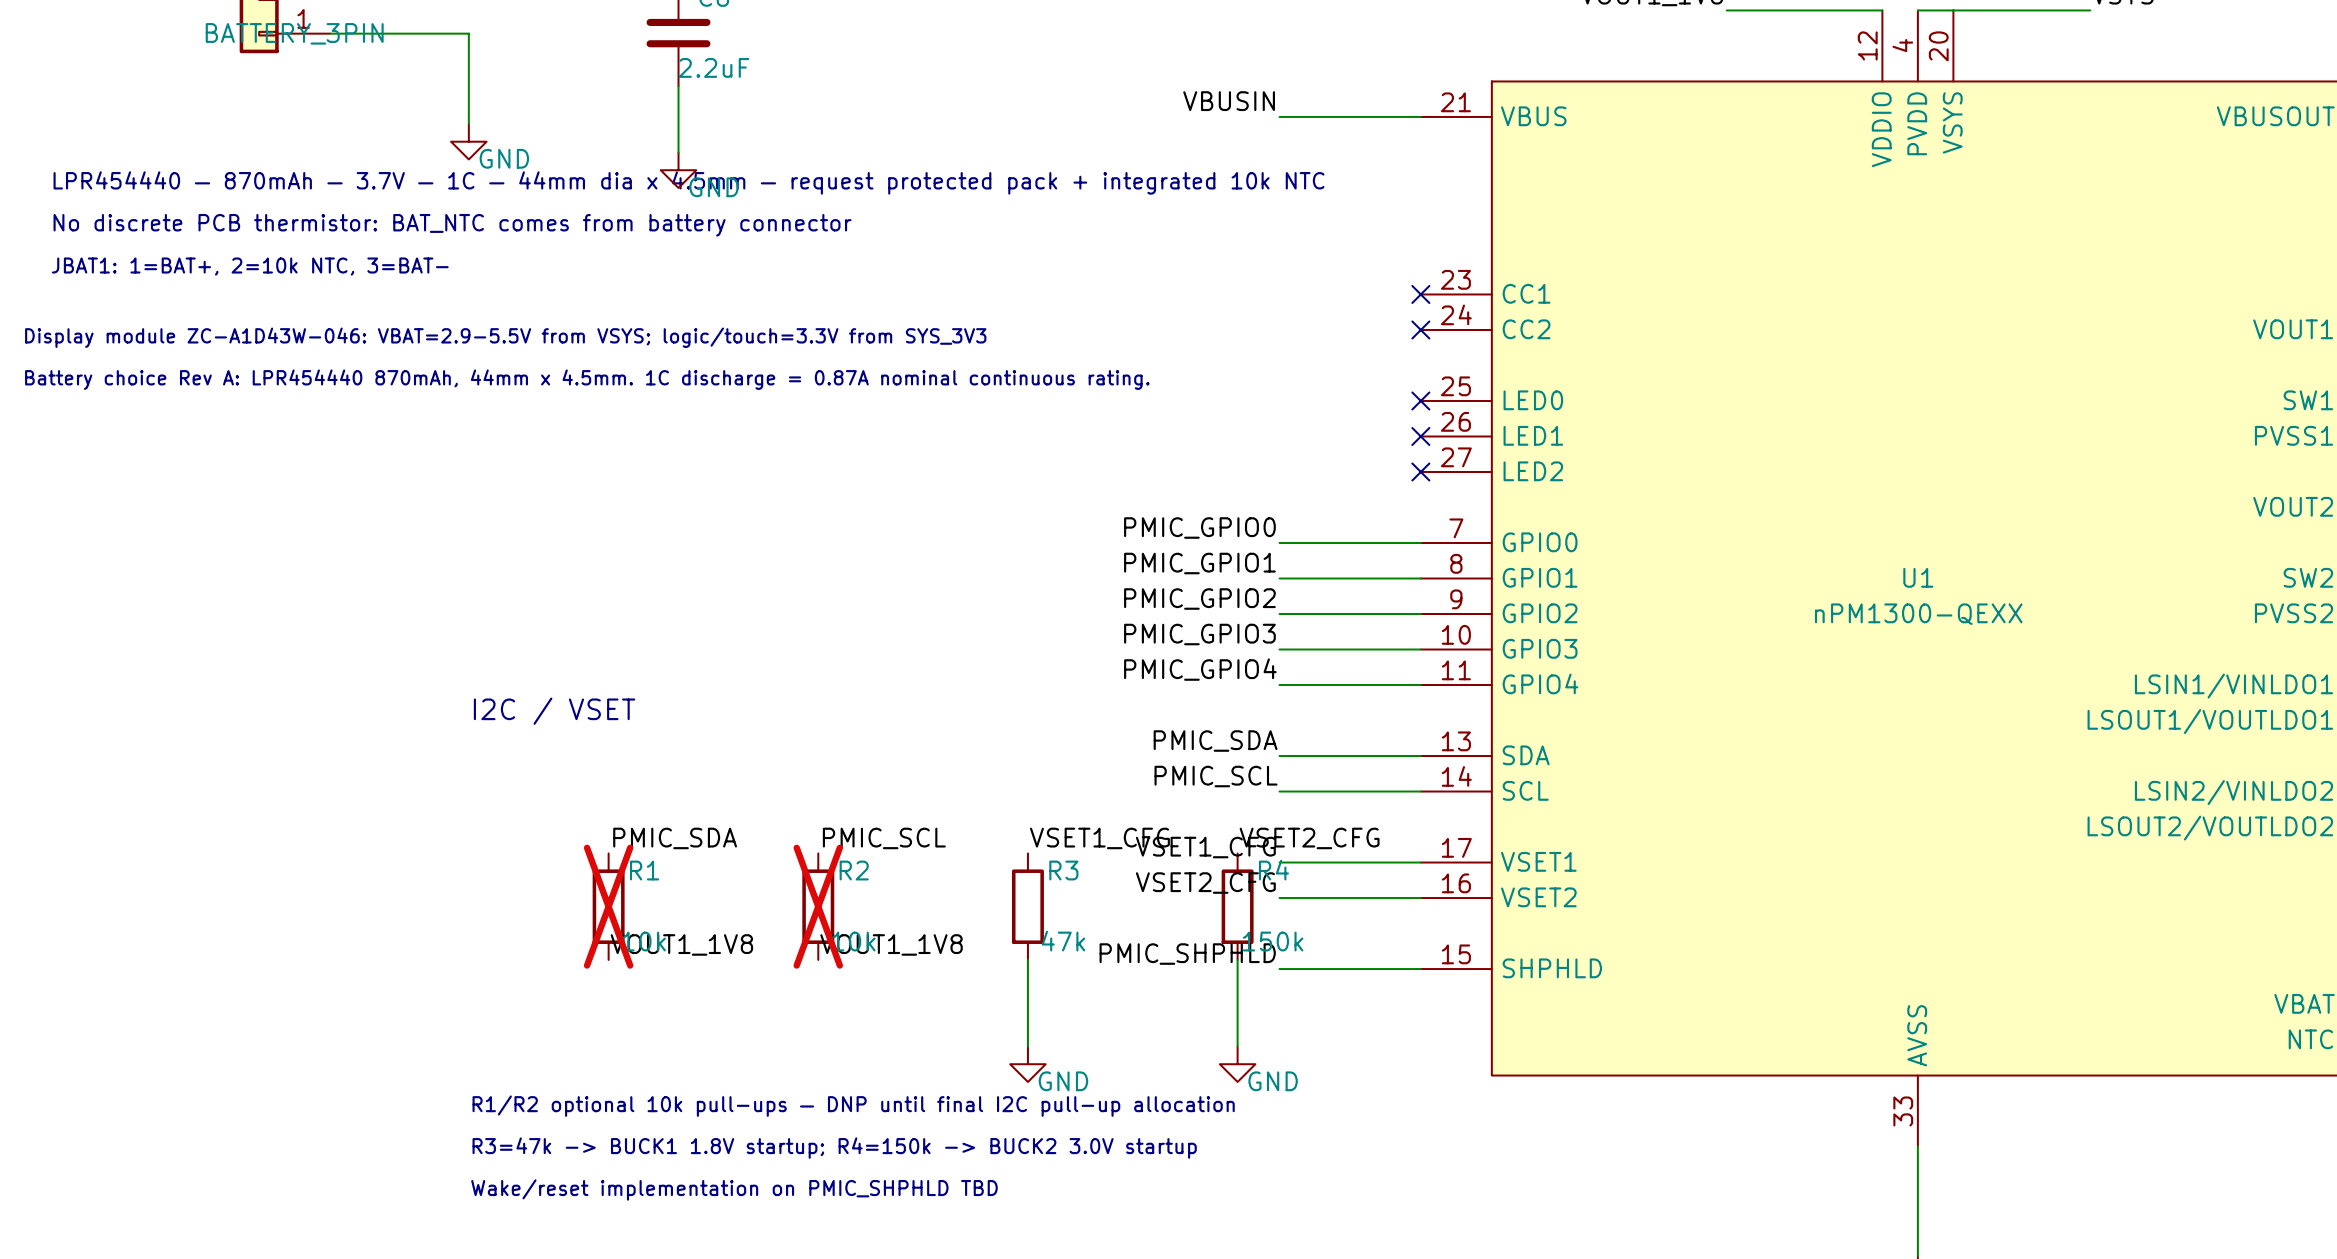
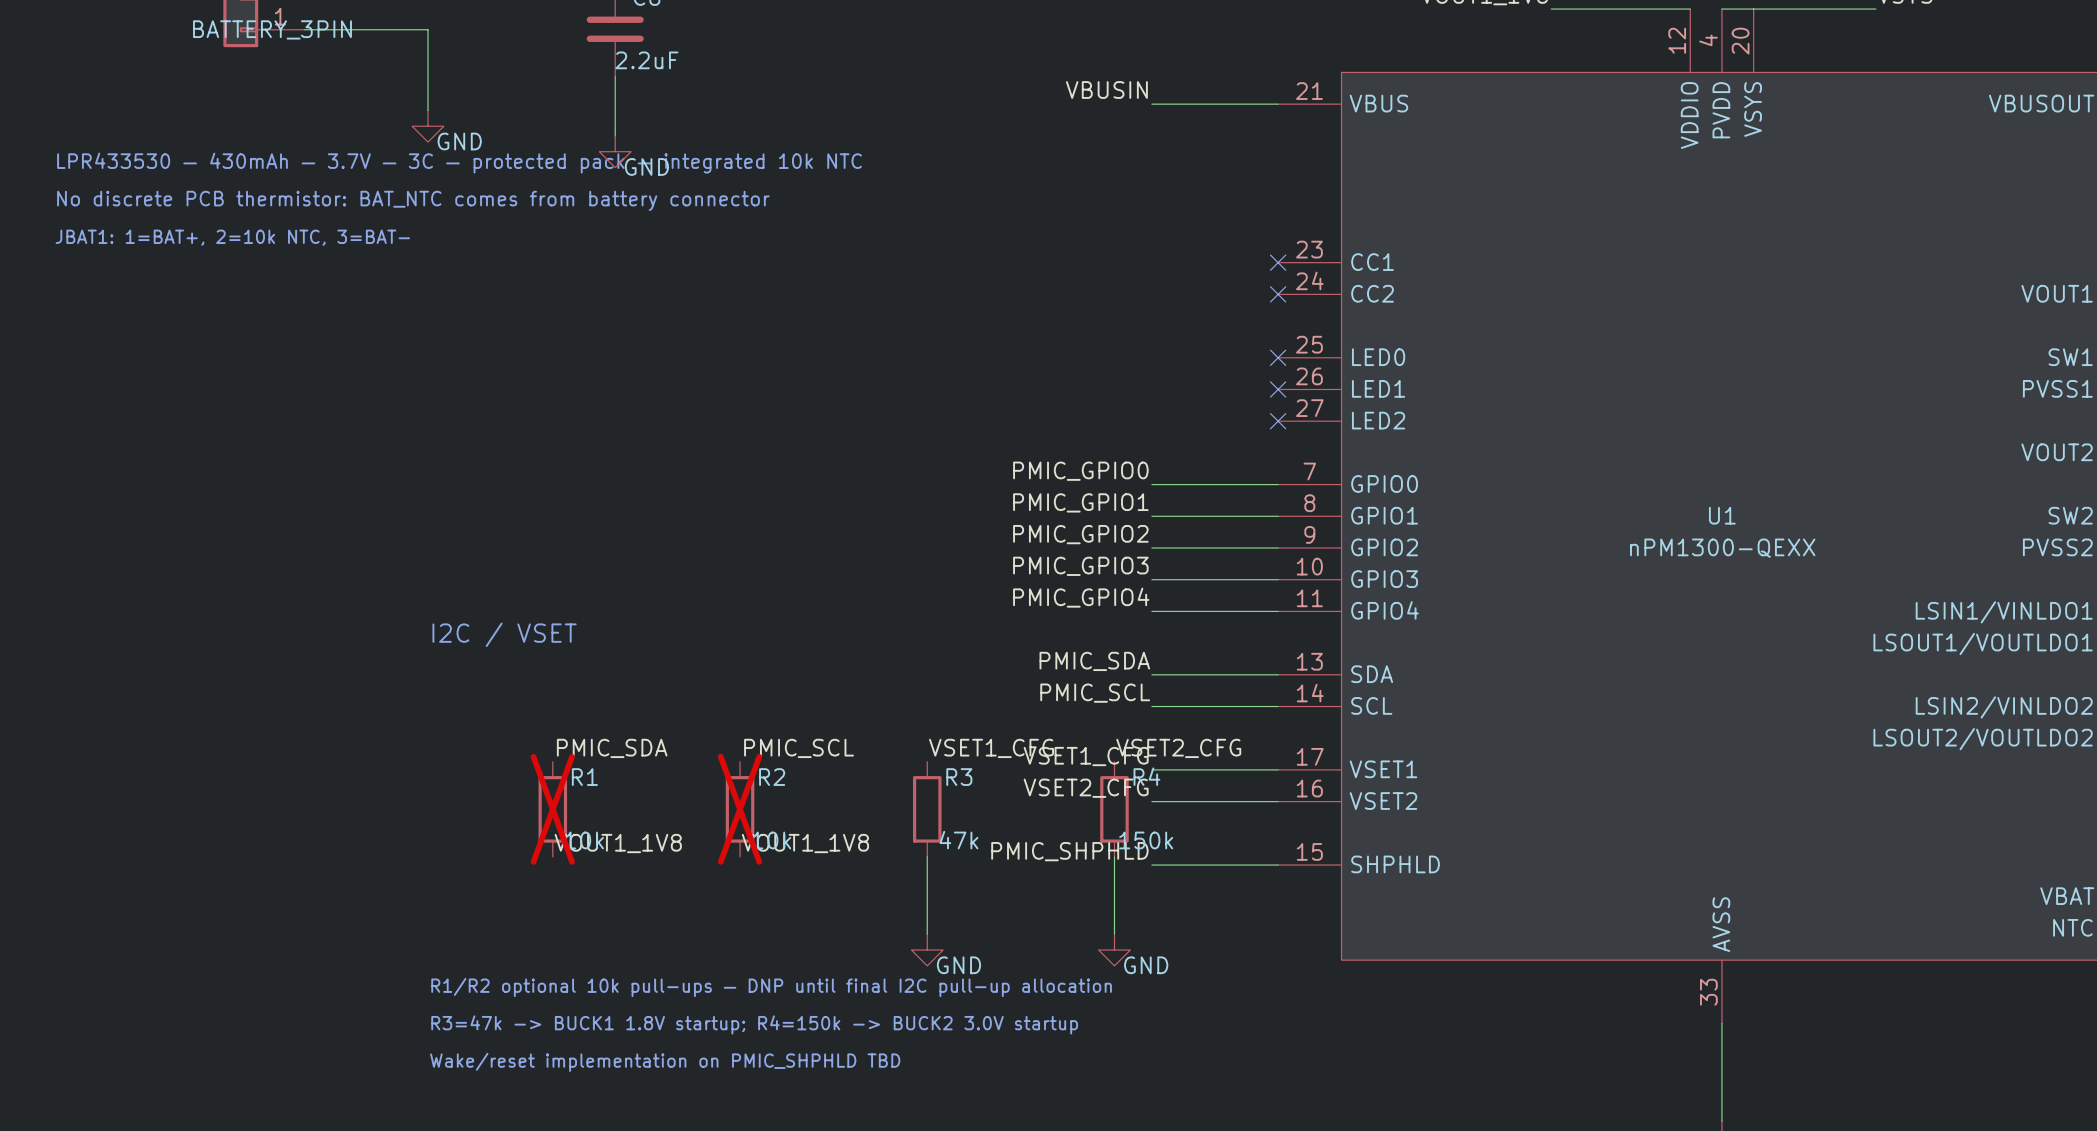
text: LPR454440 — 870mAh — 3.7V — 1C — 44mm dia x 4.5mm — request protected pack + integrated 10k NTC (689, 182) -> LPR433530 — 430mAh — 3.7V — 3C — protected pack — integrated 10k NTC (459, 163)
text: Display module ZC-A1D43W-046: VBAT=2.9-5.5V from VSYS; logic/touch=3.3V from SYS_3V3 (505, 337) -> none
text: Battery choice Rev A: LPR454440 870mAh, 44mm x 4.5mm. 1C discharge = 0.87A nominal continuous rating. (587, 379) -> none

